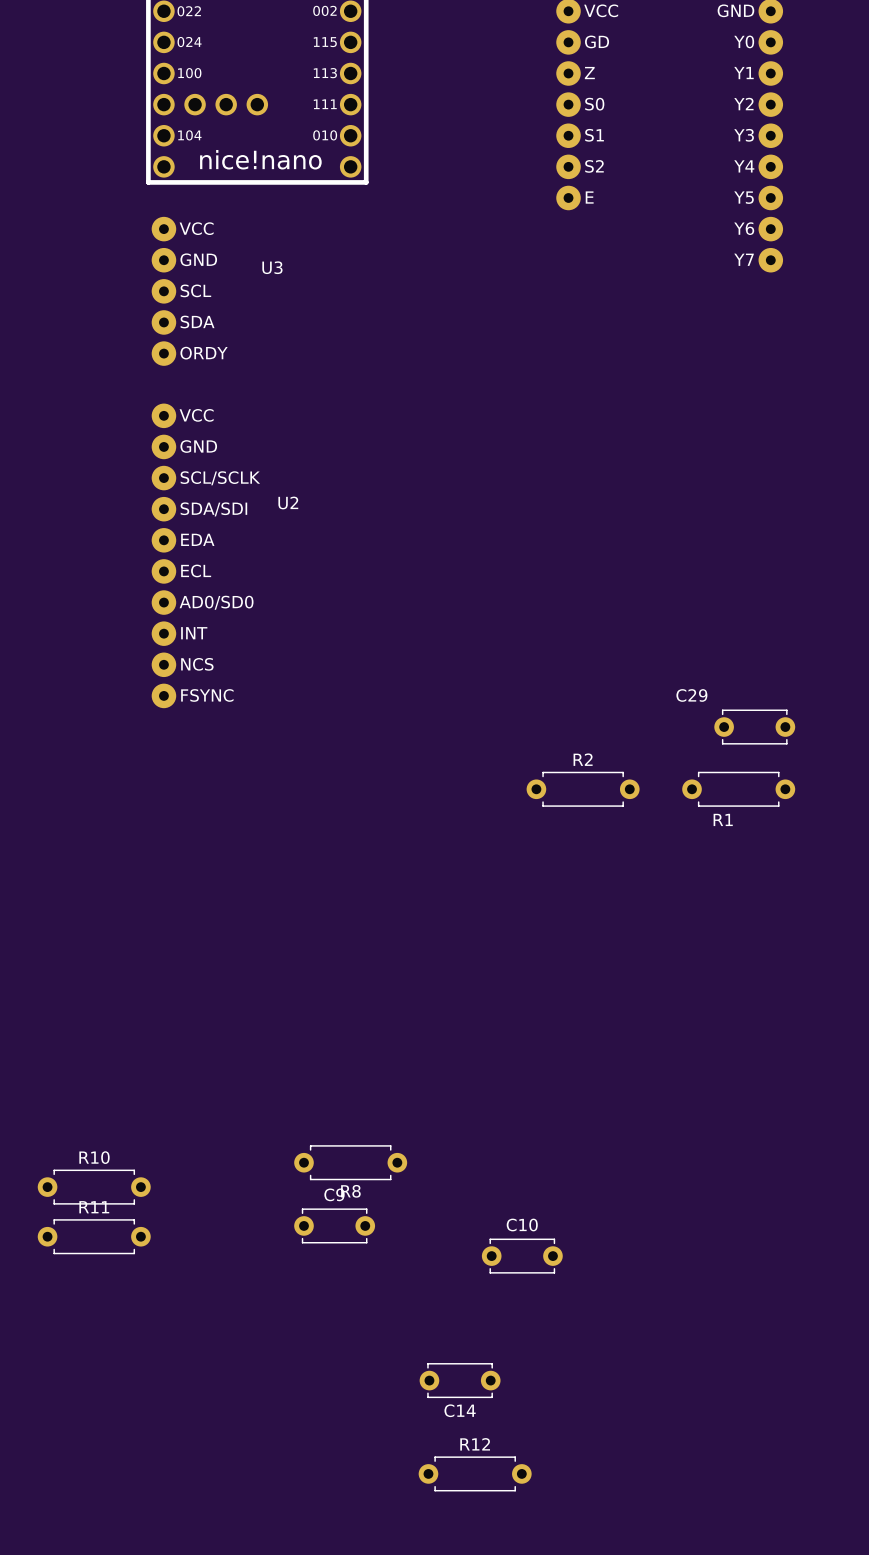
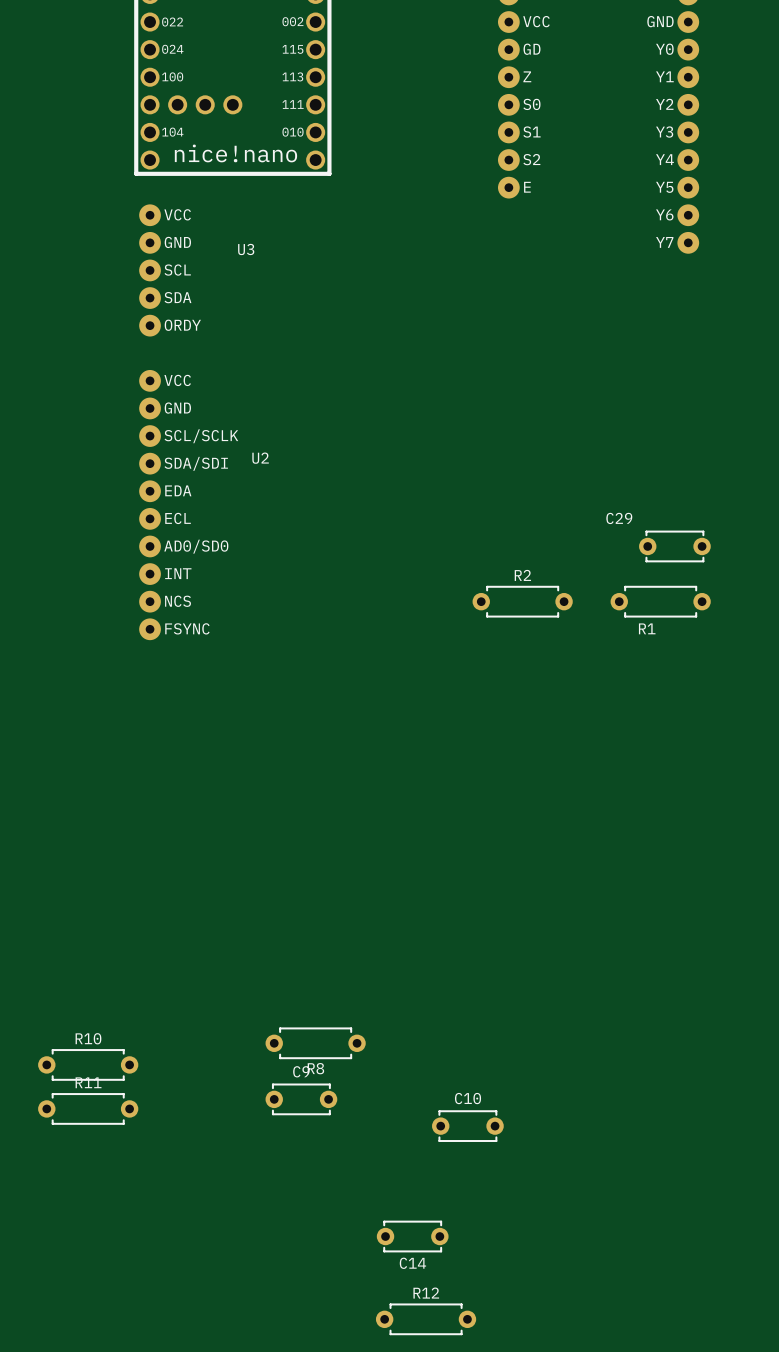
C29 position: (754, 727) -> (674, 546)
R2 position: (583, 789) -> (522, 601)
R1 position: (738, 789) -> (660, 601)

